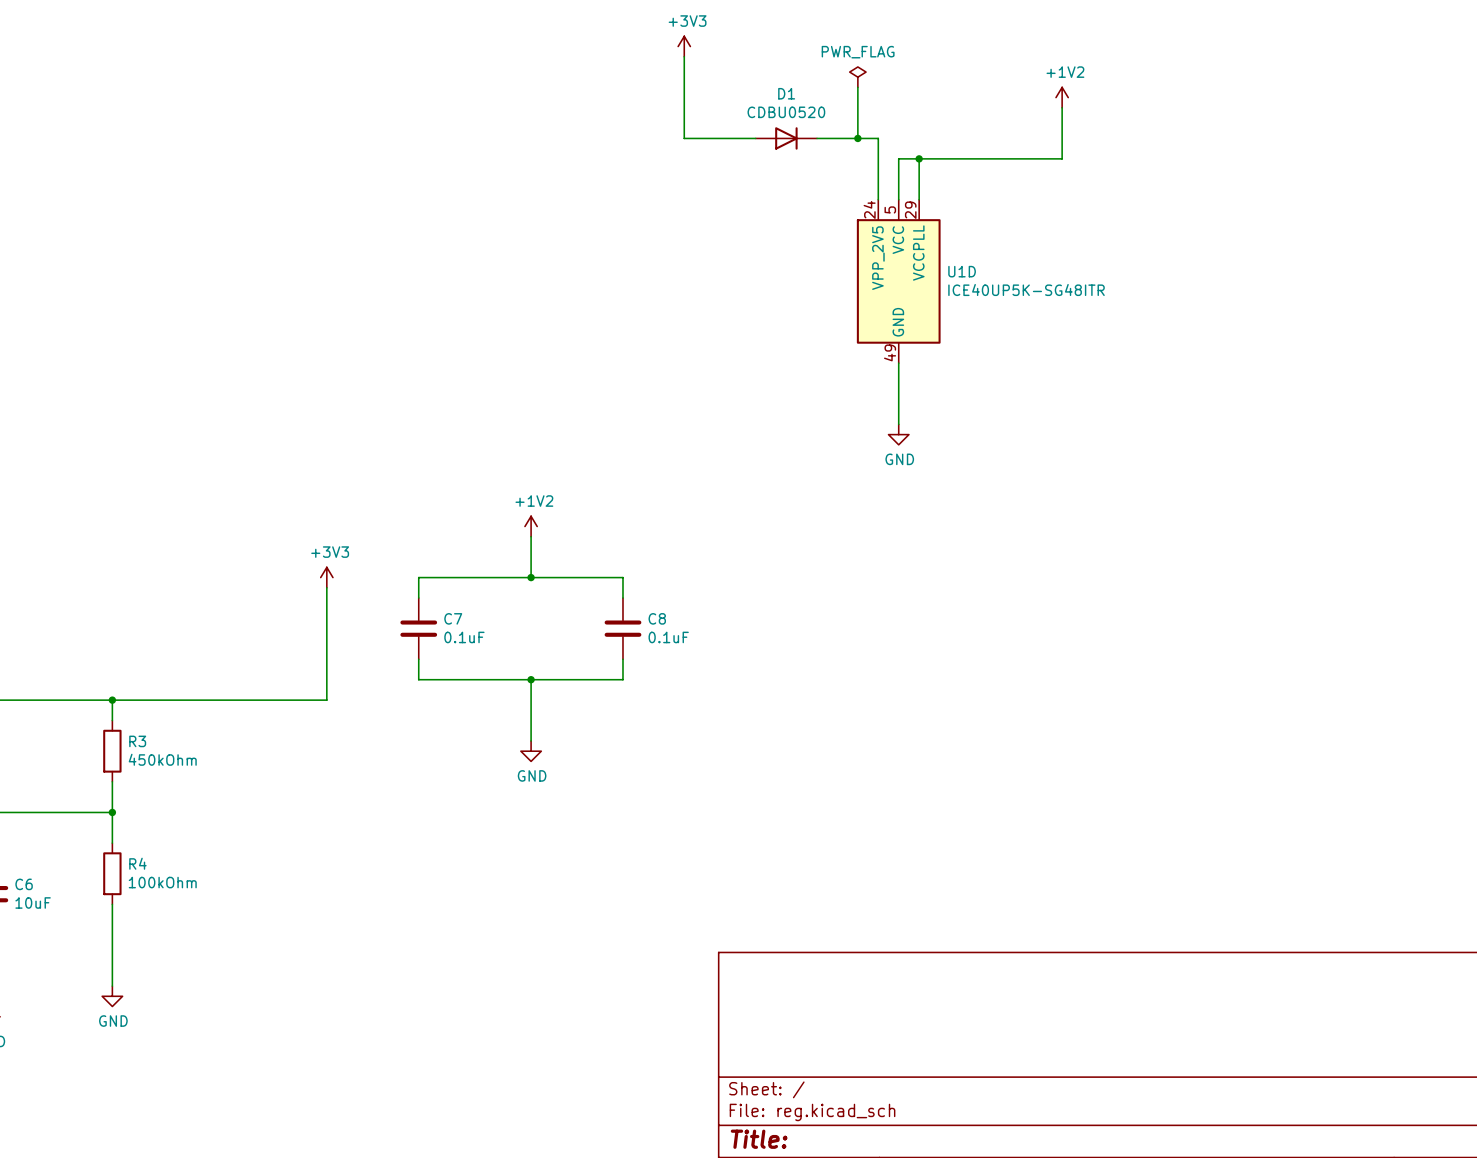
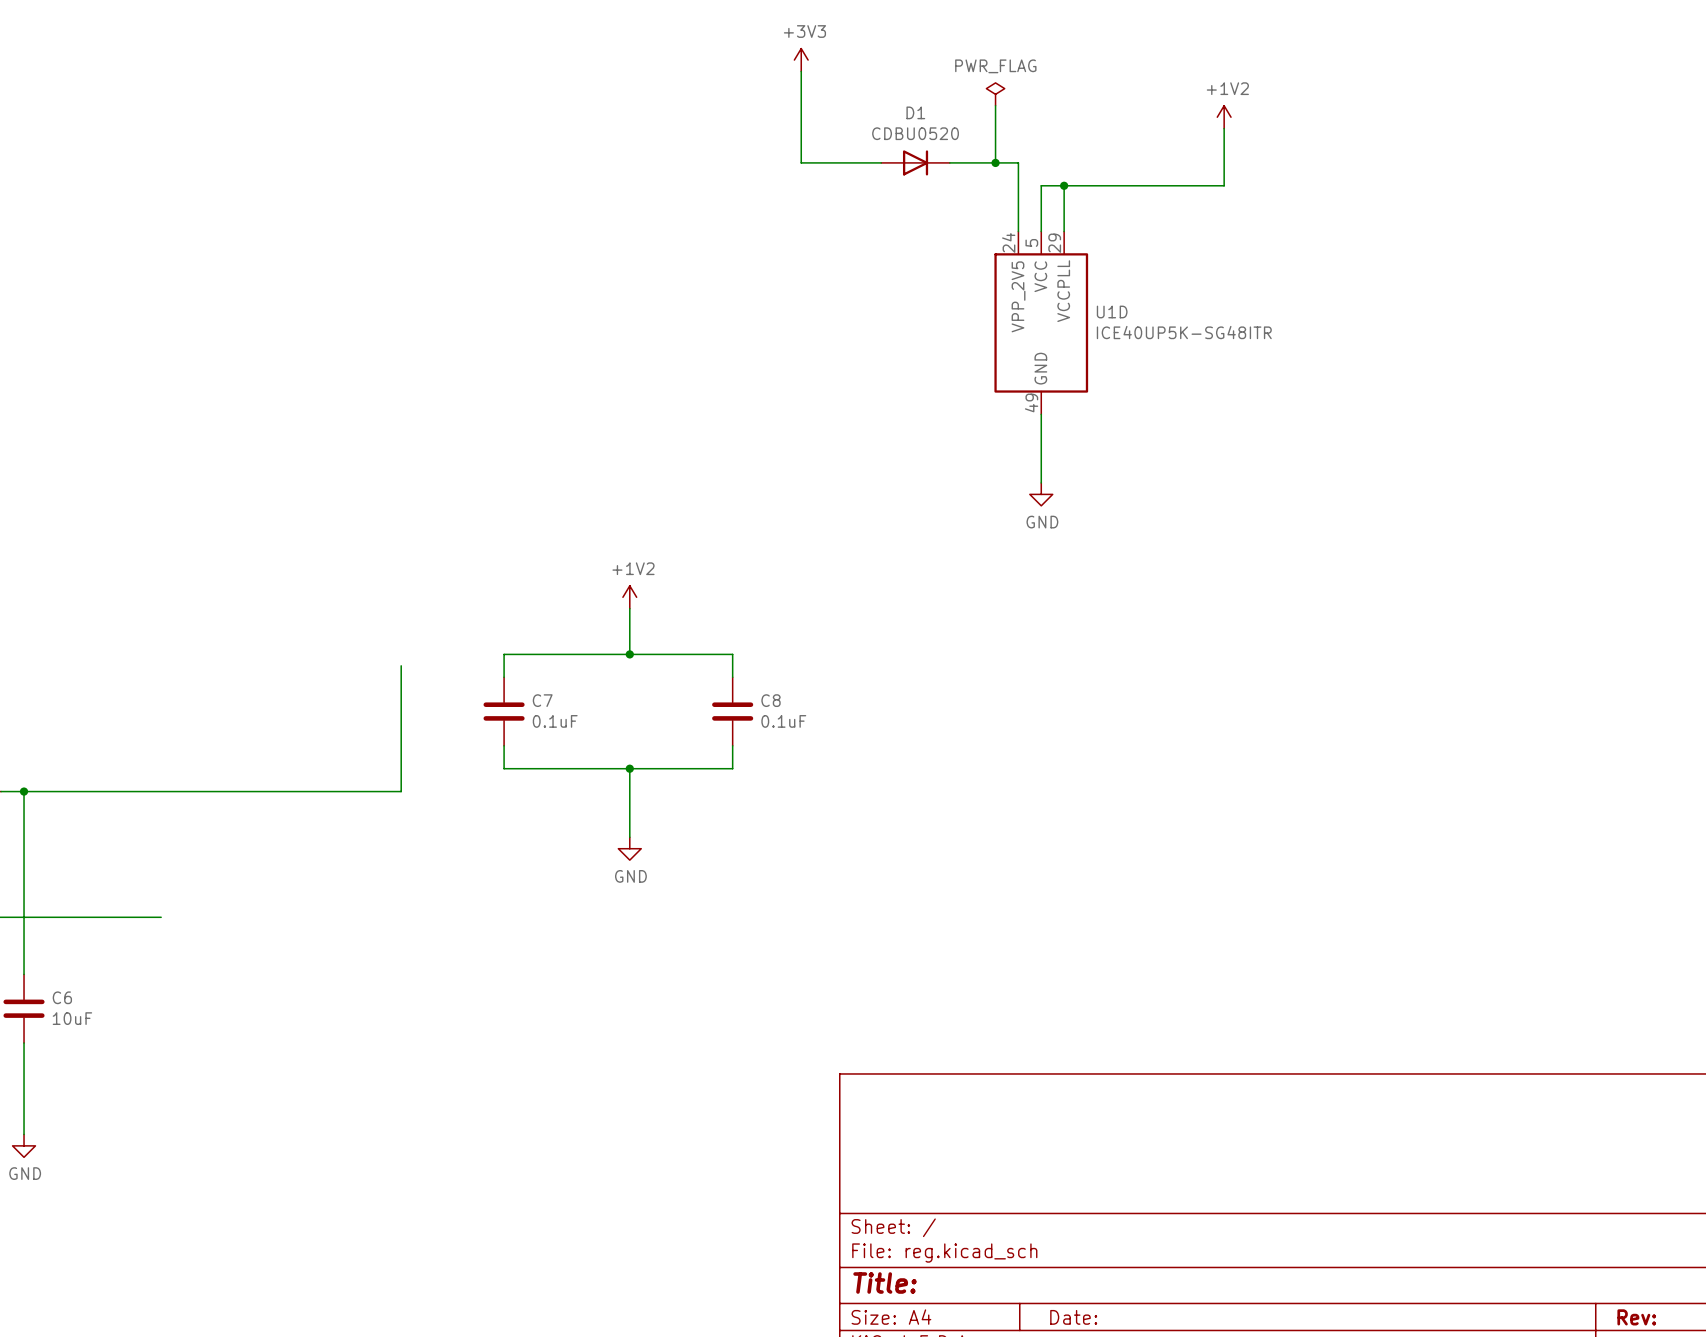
power symbol: +3V3 (326, 577) -> none
wire: (112, 700) (112, 720) -> none
junction: (112, 700) -> none
R3: 450kOhm (112, 751) -> none
wire: (112, 781) (112, 843) -> none
junction: (112, 812) -> none
R4: 100kOhm (112, 873) -> none
wire: (112, 904) (112, 986) -> none
power symbol: GND (112, 996) -> none

